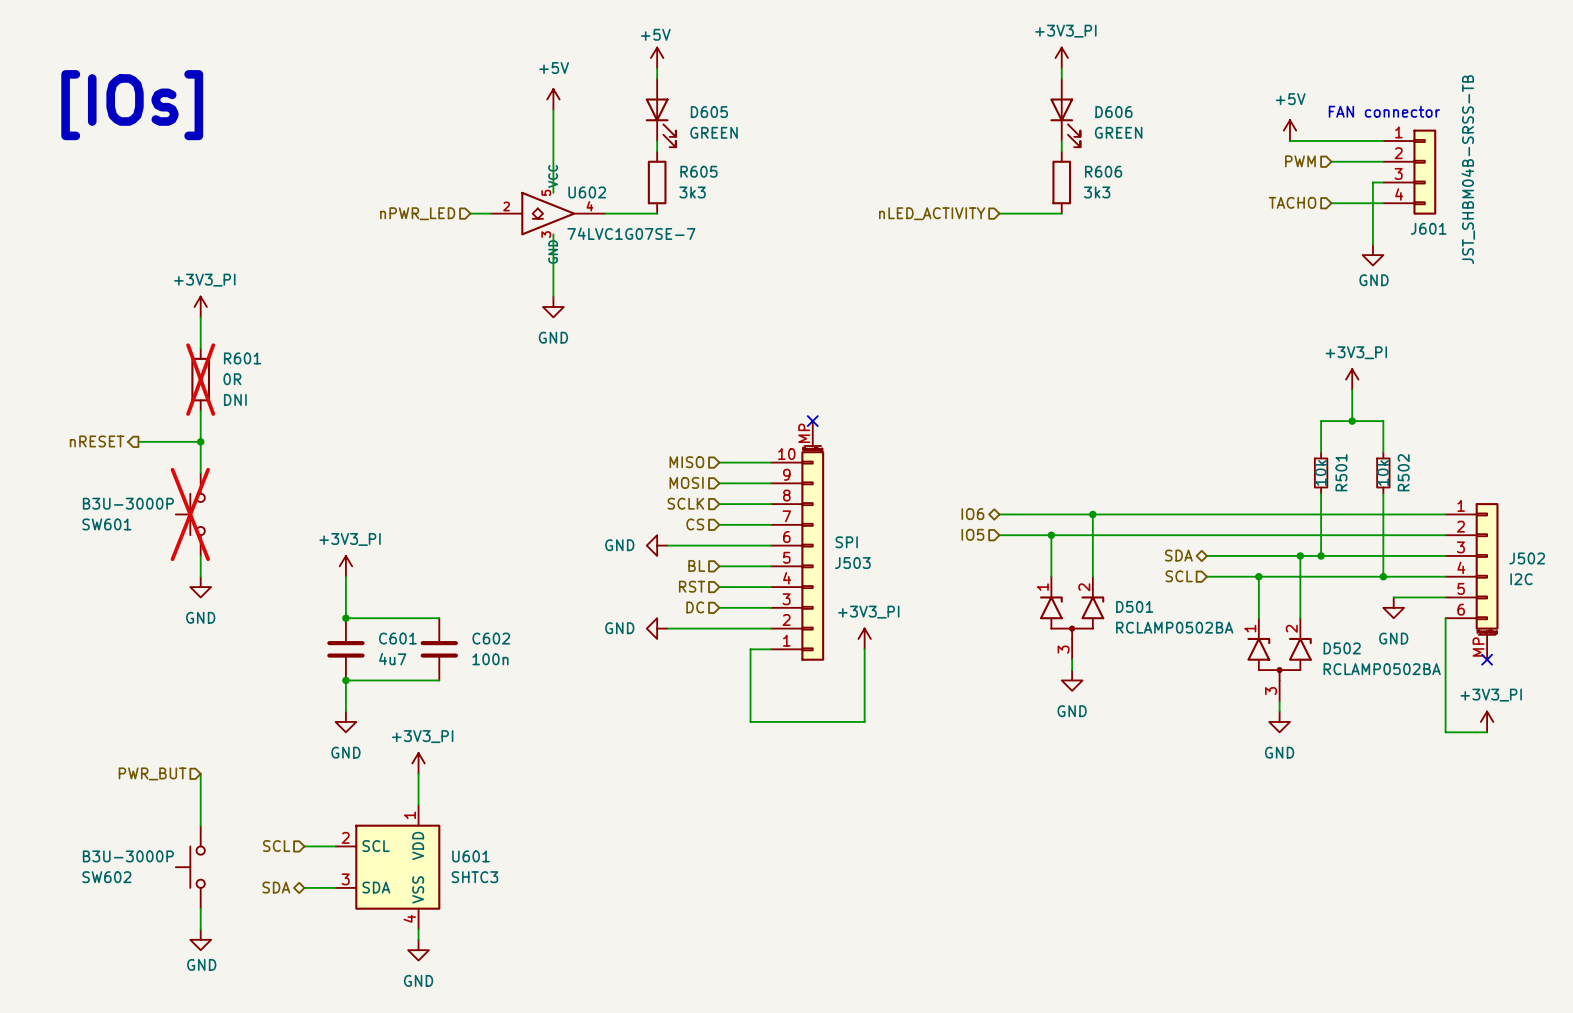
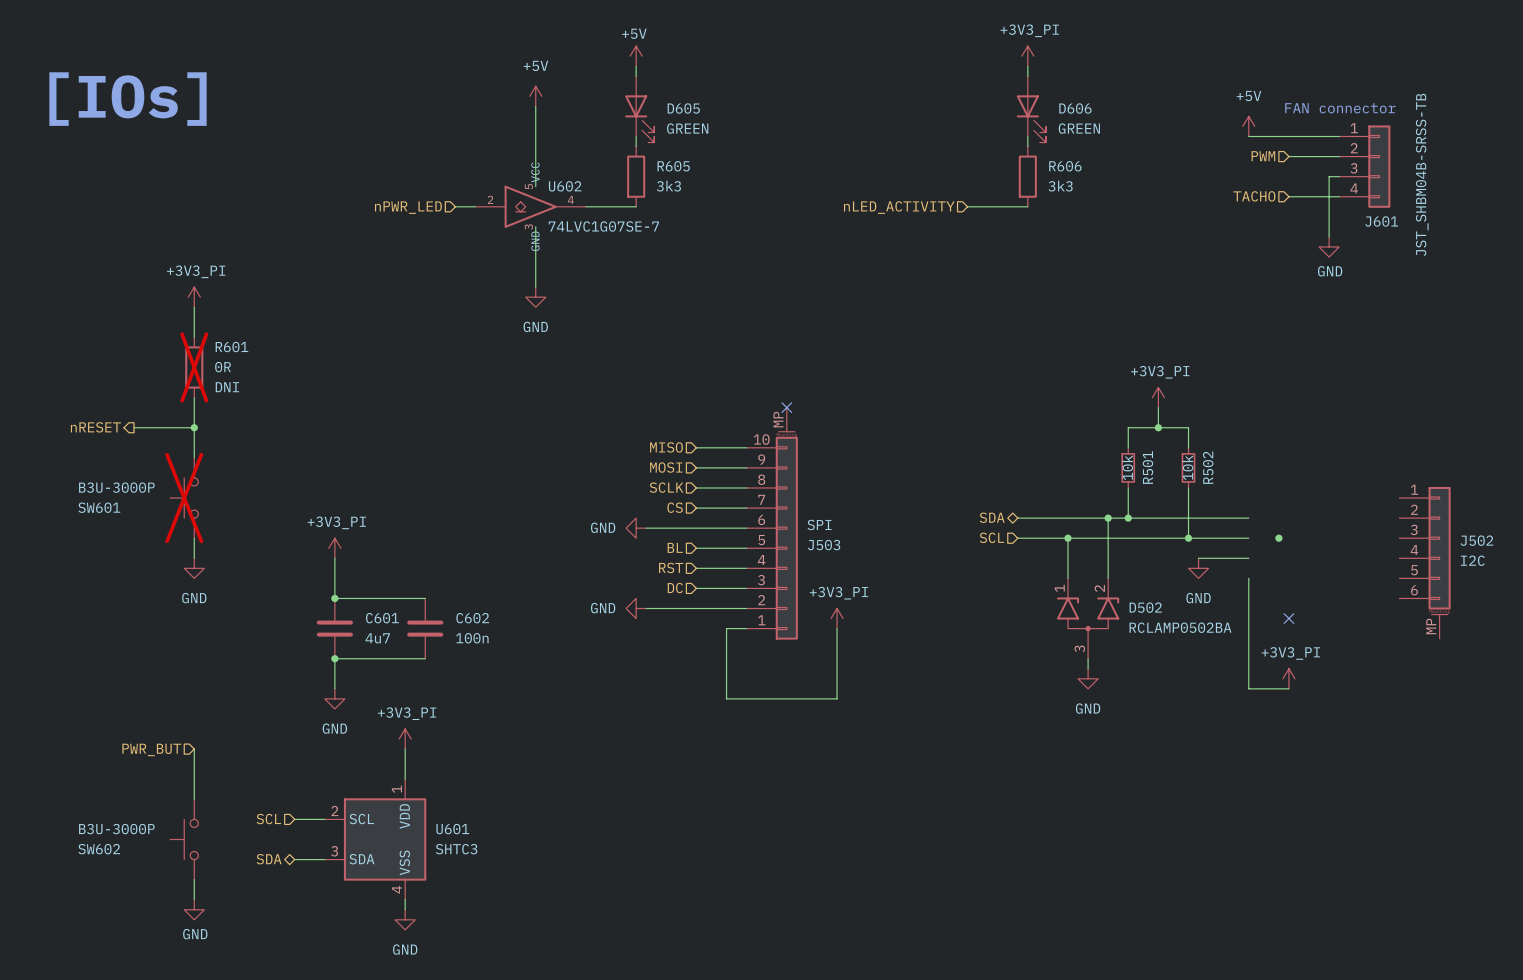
power symbol position: +3V3_PI (1352, 379) -> +3V3_PI (1158, 397)
wire: (1352, 389) (1352, 421) -> none
wire: none -> (1158, 407) (1158, 427)
junction: (1352, 421) -> none
junction: none -> (1158, 427)
wire: (1321, 452) (1321, 421) (1383, 421) (1383, 452) -> none
wire: none -> (1128, 447) (1128, 427) (1188, 427) (1188, 447)
R501 position: (1321, 472) -> (1128, 467)
R502 position: (1383, 472) -> (1188, 467)
wire: (1321, 493) (1321, 555) -> none
wire: (1383, 493) (1383, 576) -> none
wire: none -> (1128, 487) (1128, 518)
wire: none -> (1188, 487) (1188, 538)
hierarchical label: IO6 (972, 514) -> none
wire: (999, 514) (1445, 514) -> none
wire: (1092, 514) (1092, 576) -> none
junction: (1092, 514) -> none
hierarchical label: IO5 (972, 534) -> none
wire: (999, 535) (1051, 535) (1051, 576) -> none
junction: (1051, 535) -> none
junction: none -> (1108, 518)
junction: none -> (1128, 518)
wire: (1289, 535) (1445, 535) -> none
wire: none -> (1017, 538) (1168, 538)
junction: none -> (1068, 538)
hierarchical label position: SDA (1178, 555) -> SDA (992, 517)
junction: none -> (1188, 538)
wire: (1289, 555) (1445, 555) -> none
wire: (1300, 555) (1300, 618) -> (1108, 518) (1108, 578)
junction: (1300, 555) -> none
hierarchical label position: SCL (1179, 576) -> SCL (991, 537)
wire: (1206, 576) (1238, 576) -> none
wire: (1258, 576) (1258, 618) -> (1068, 538) (1068, 578)
junction: (1258, 576) -> none
wire: (1289, 576) (1445, 576) -> none
junction: (1383, 576) -> none
power symbol: none -> GND (1198, 568)
wire: (1393, 597) (1445, 597) -> none
power symbol: GND (1393, 607) -> none
D501: RCLAMP0502BA (1072, 618) -> none
wire: (1445, 618) (1445, 732) (1487, 732) -> (1248, 578) (1248, 688) (1288, 688)
no-connect mark: none -> (1288, 618)
wire: (1072, 659) (1072, 670) -> none
D502 position: (1279, 659) -> (1088, 618)
no-connect mark: (1487, 659) -> none
power symbol position: GND (1072, 680) -> GND (1088, 678)
wire: (1279, 701) (1279, 711) -> (1088, 658) (1088, 668)
power symbol: GND (1279, 721) -> none
power symbol position: +3V3_PI (1487, 721) -> +3V3_PI (1288, 678)

